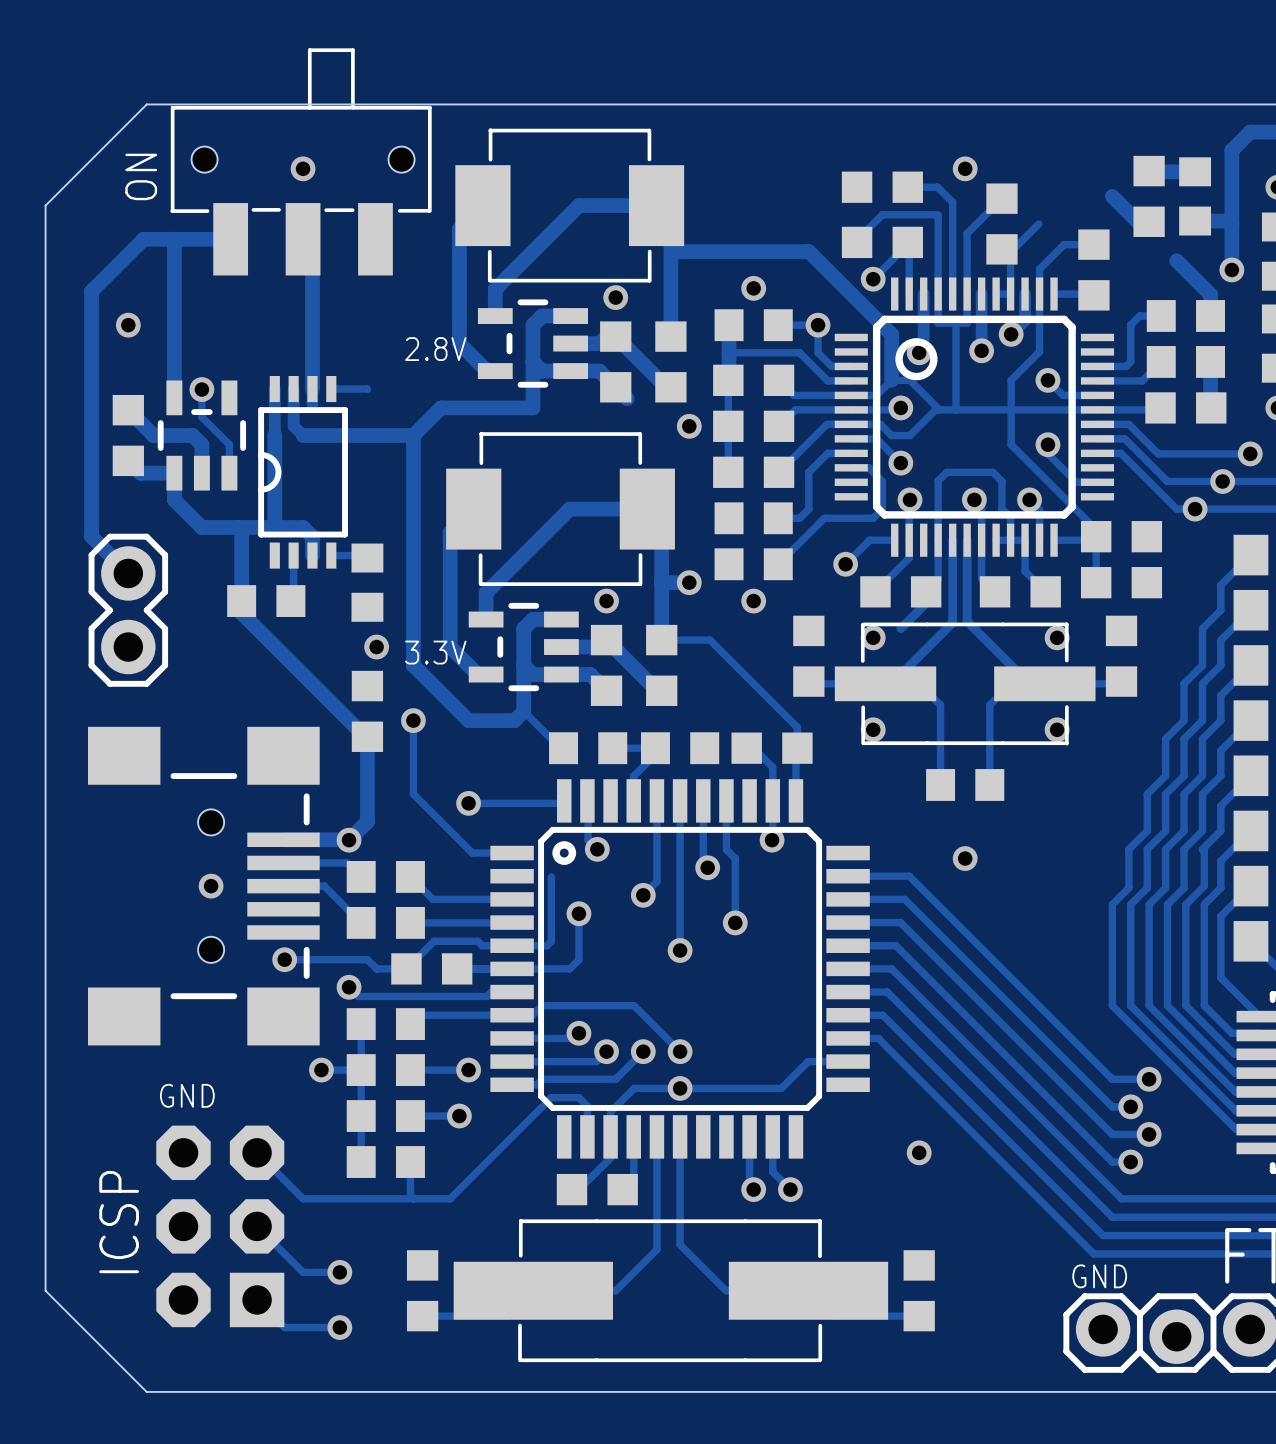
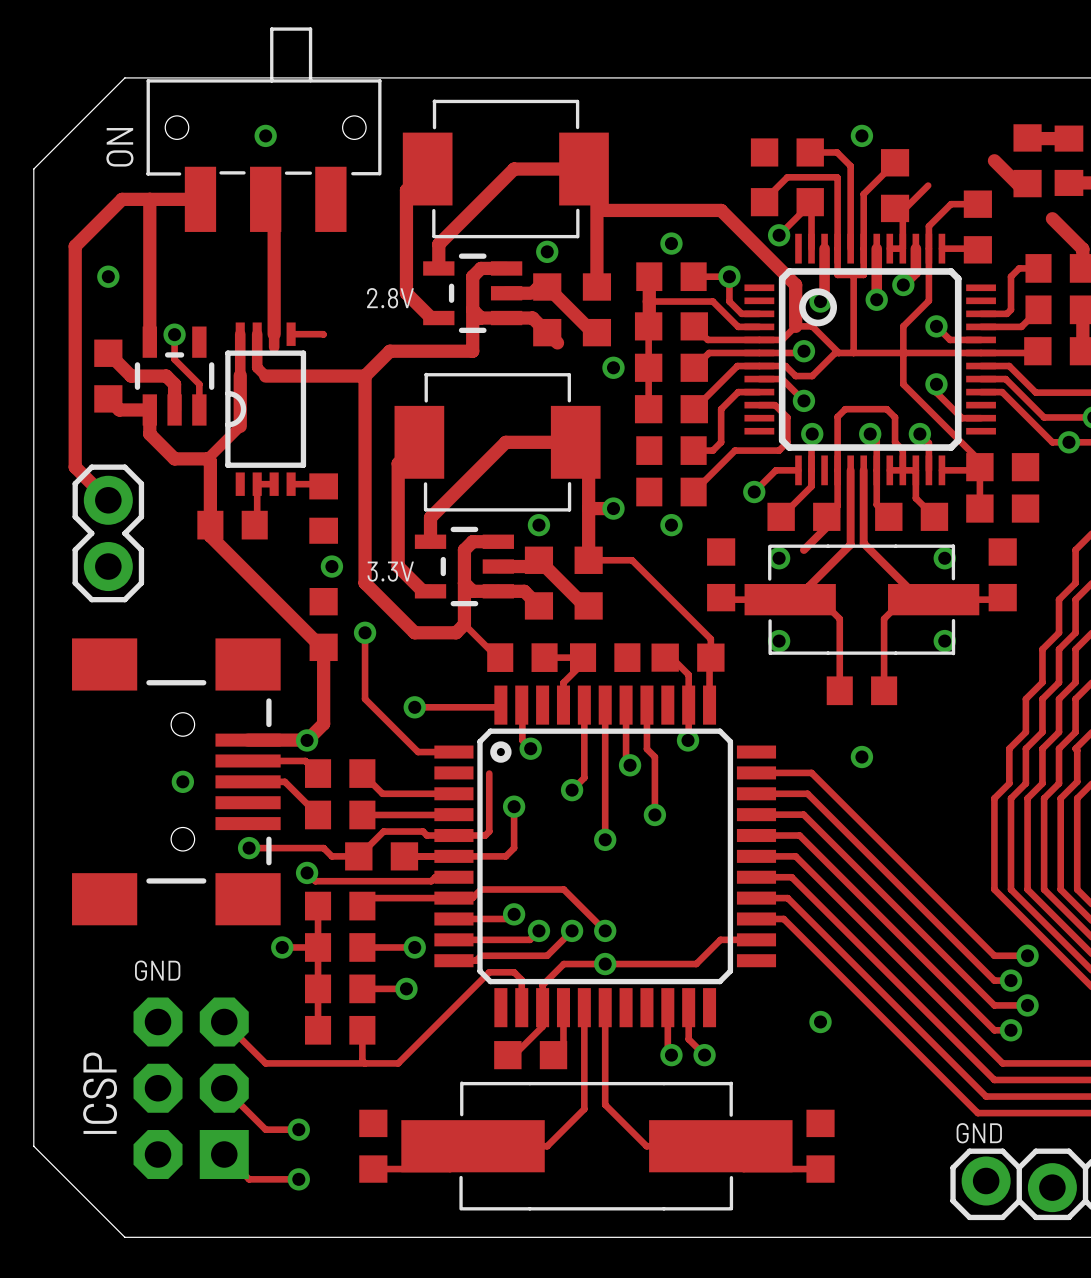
track: (274, 491) (275, 527) -> (240, 426) (207, 458)
track: (238, 527) (303, 527) (312, 536) (312, 555) -> (257, 484) (274, 484)

